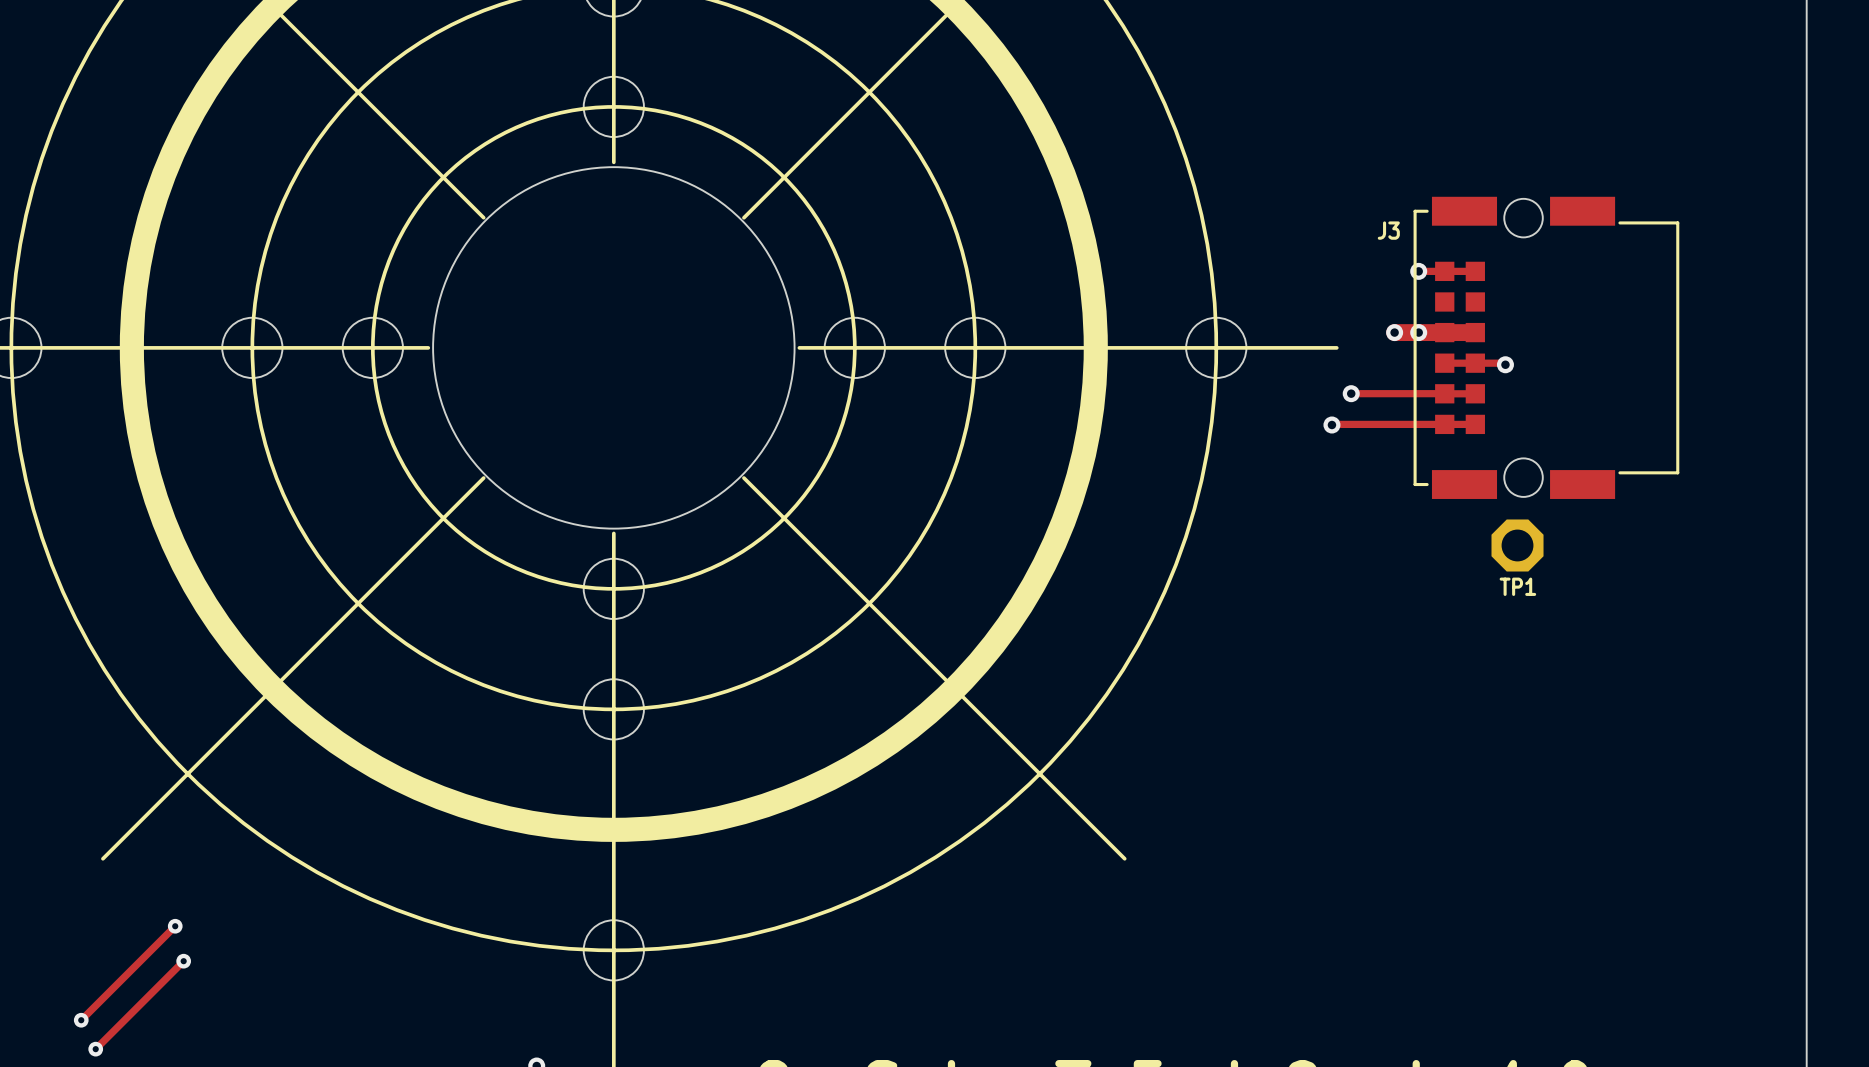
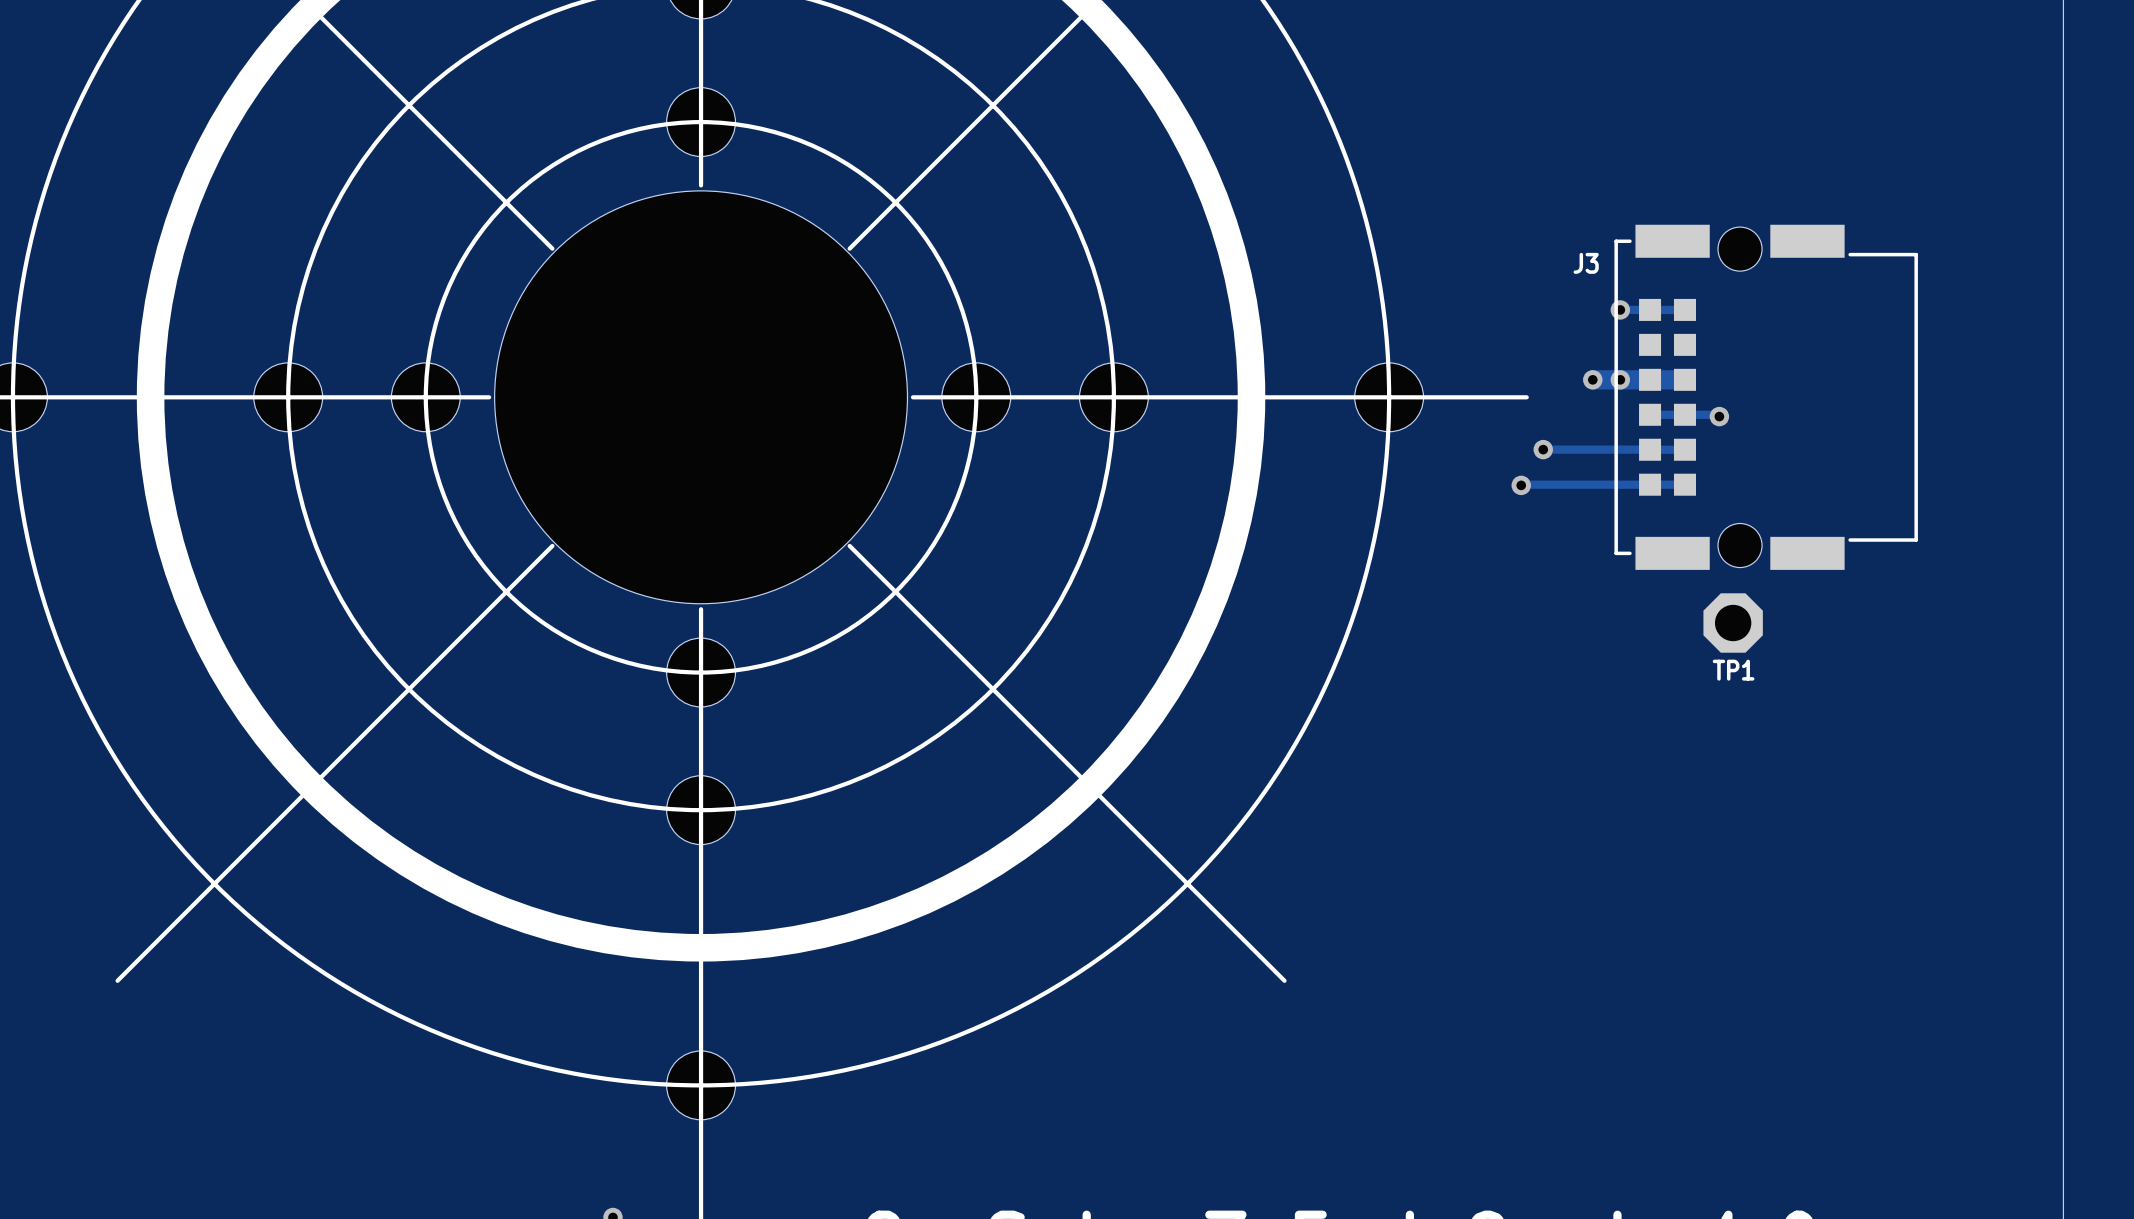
track: (175, 926) (81, 1020) -> none
via: (175, 926) -> none
track: (183, 961) (95, 1049) -> none
via: (183, 961) -> none
via: (81, 1020) -> none
via: (95, 1049) -> none

